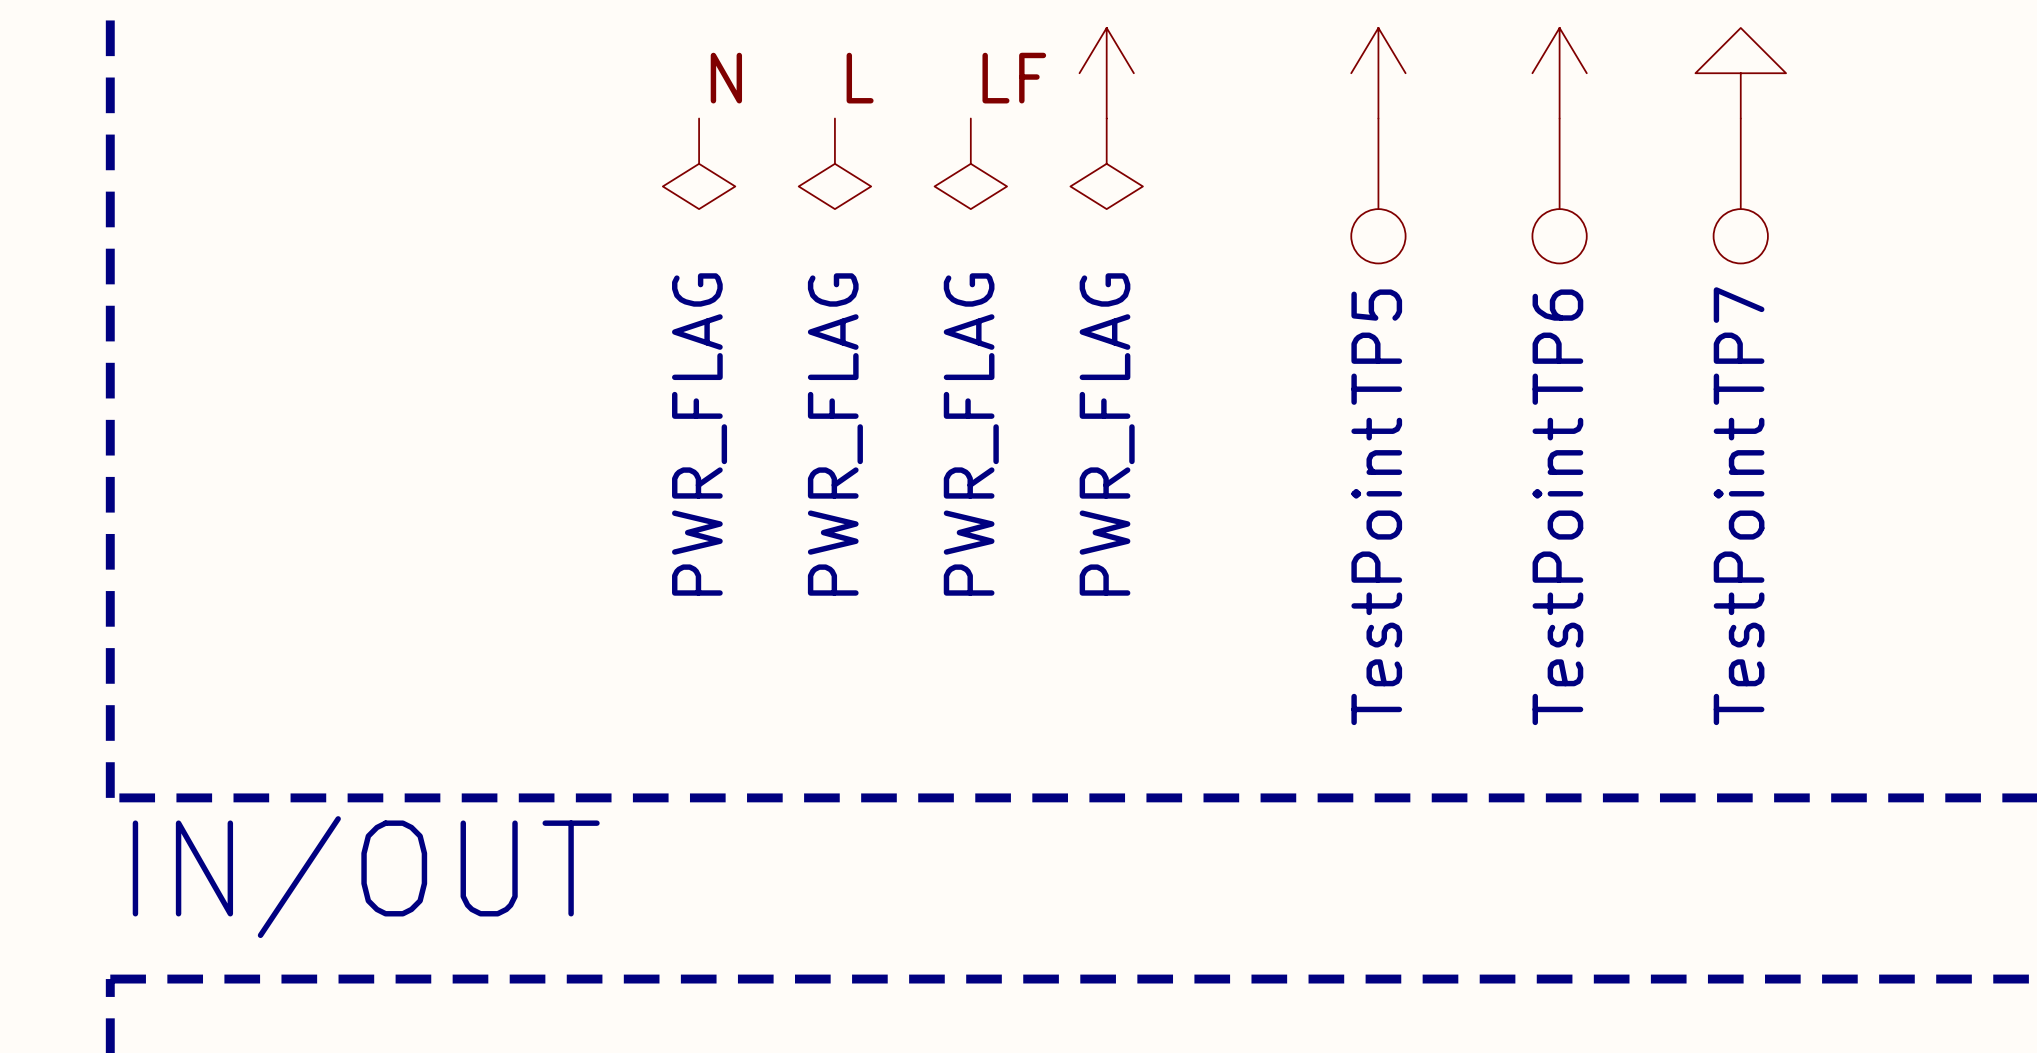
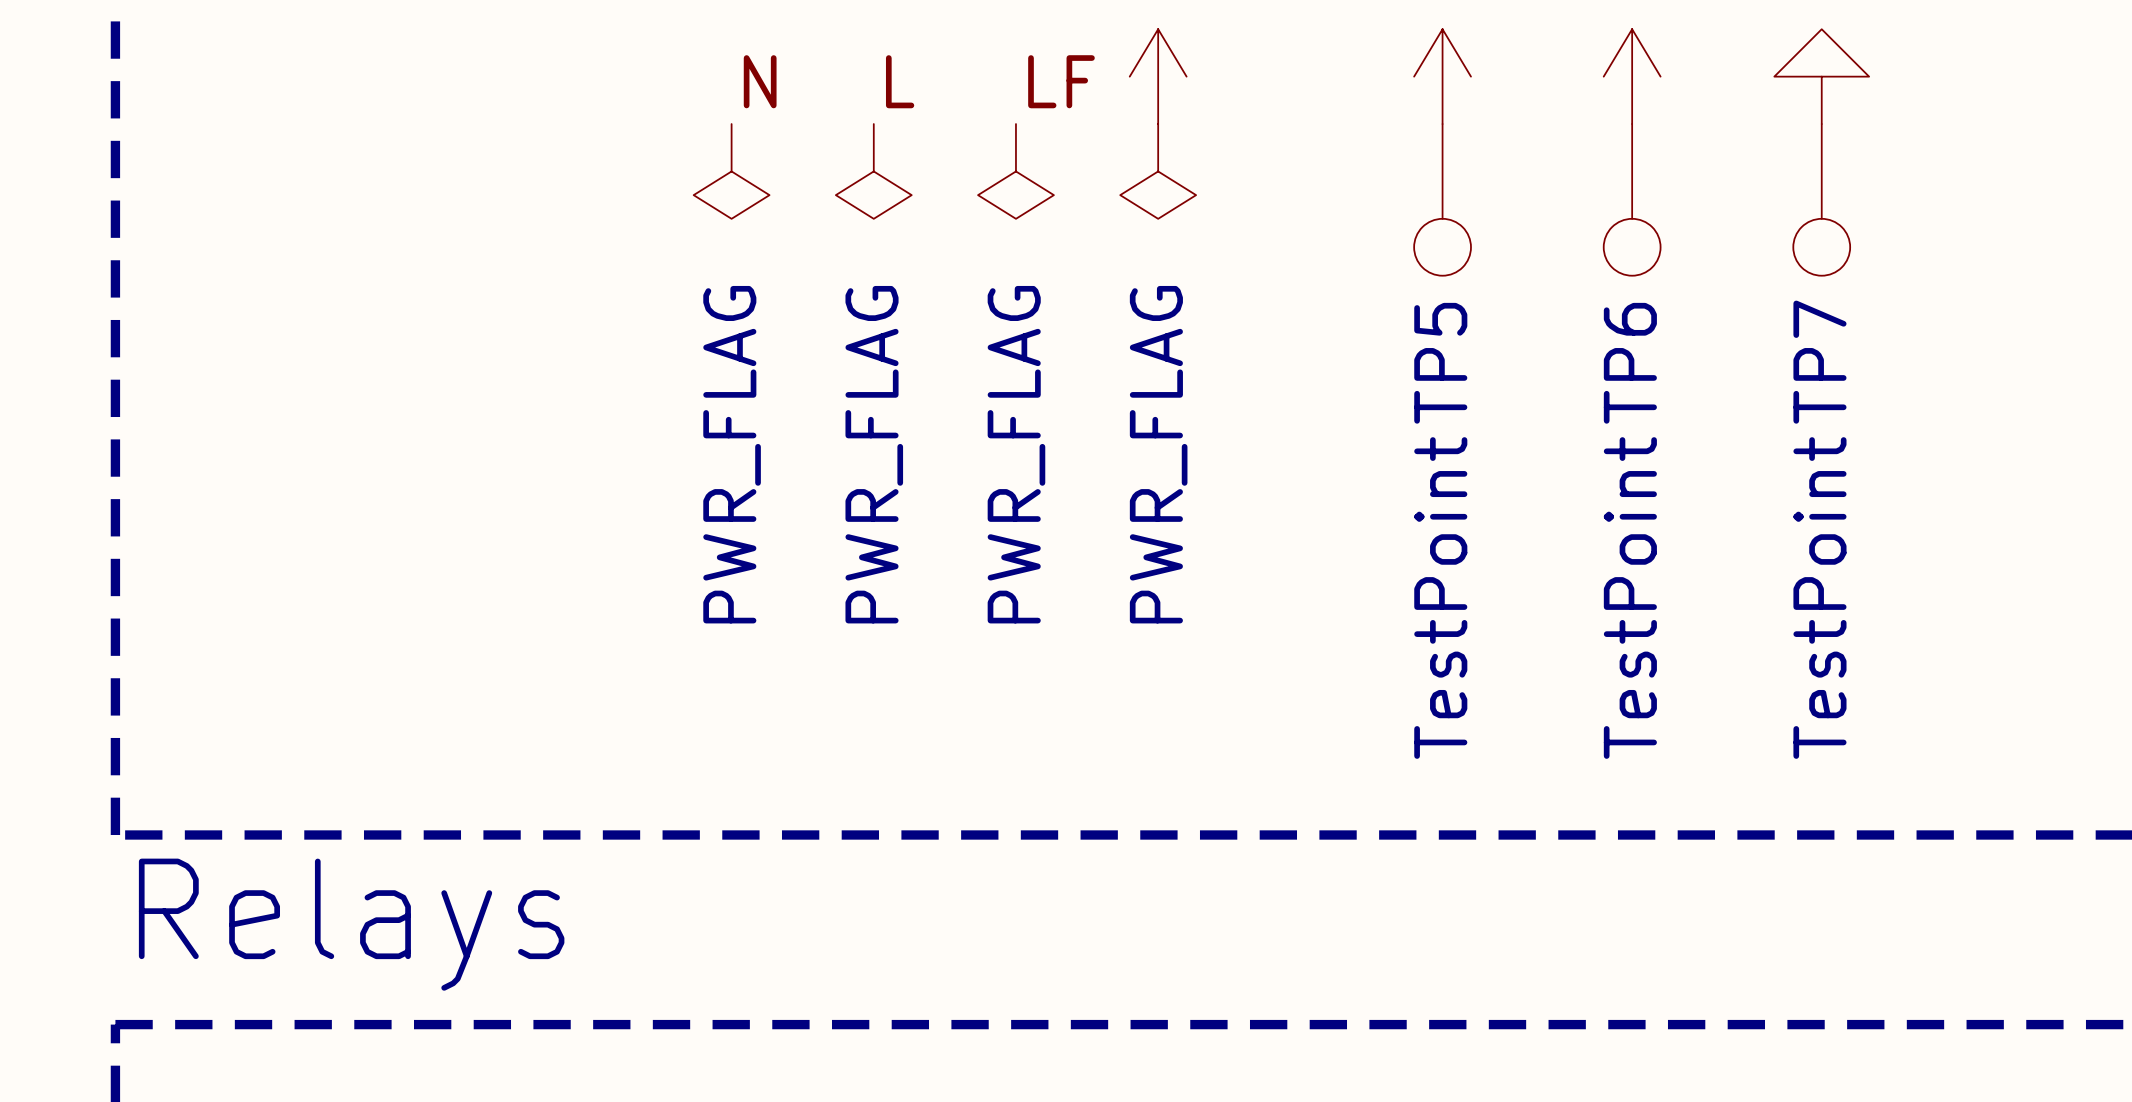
text: IN/OUT (366, 877) -> Relays (351, 924)

